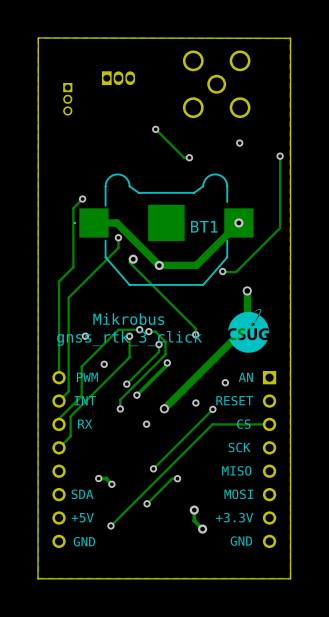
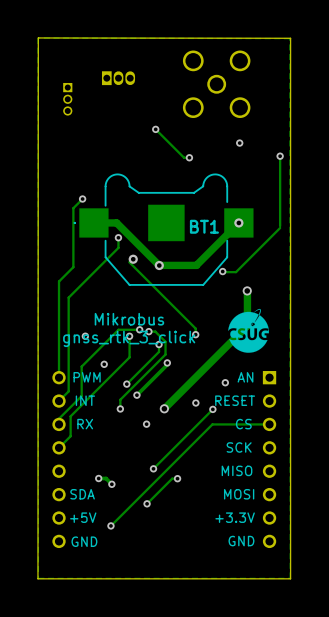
track: (194, 510) (194, 520) (202, 529) -> none
via: (194, 510) -> none
via: (202, 529) -> none

